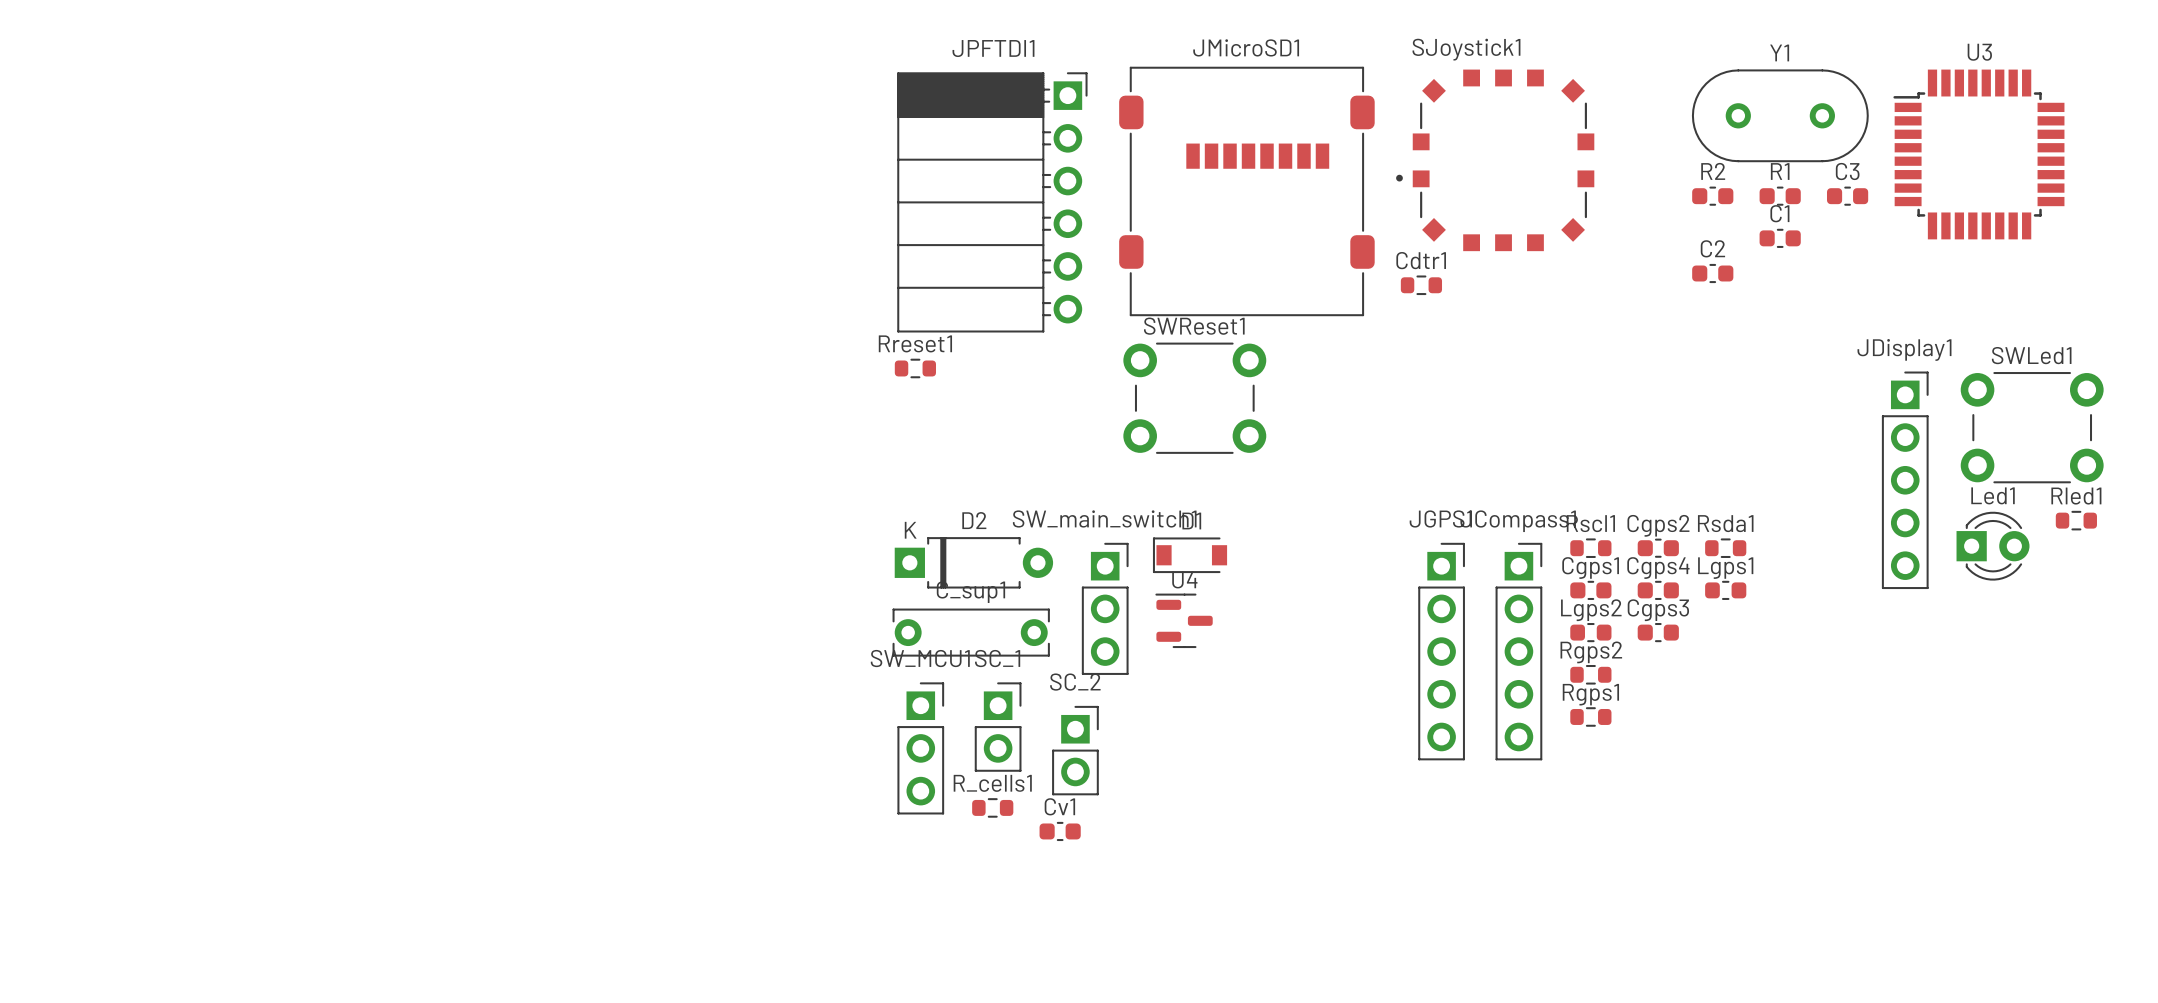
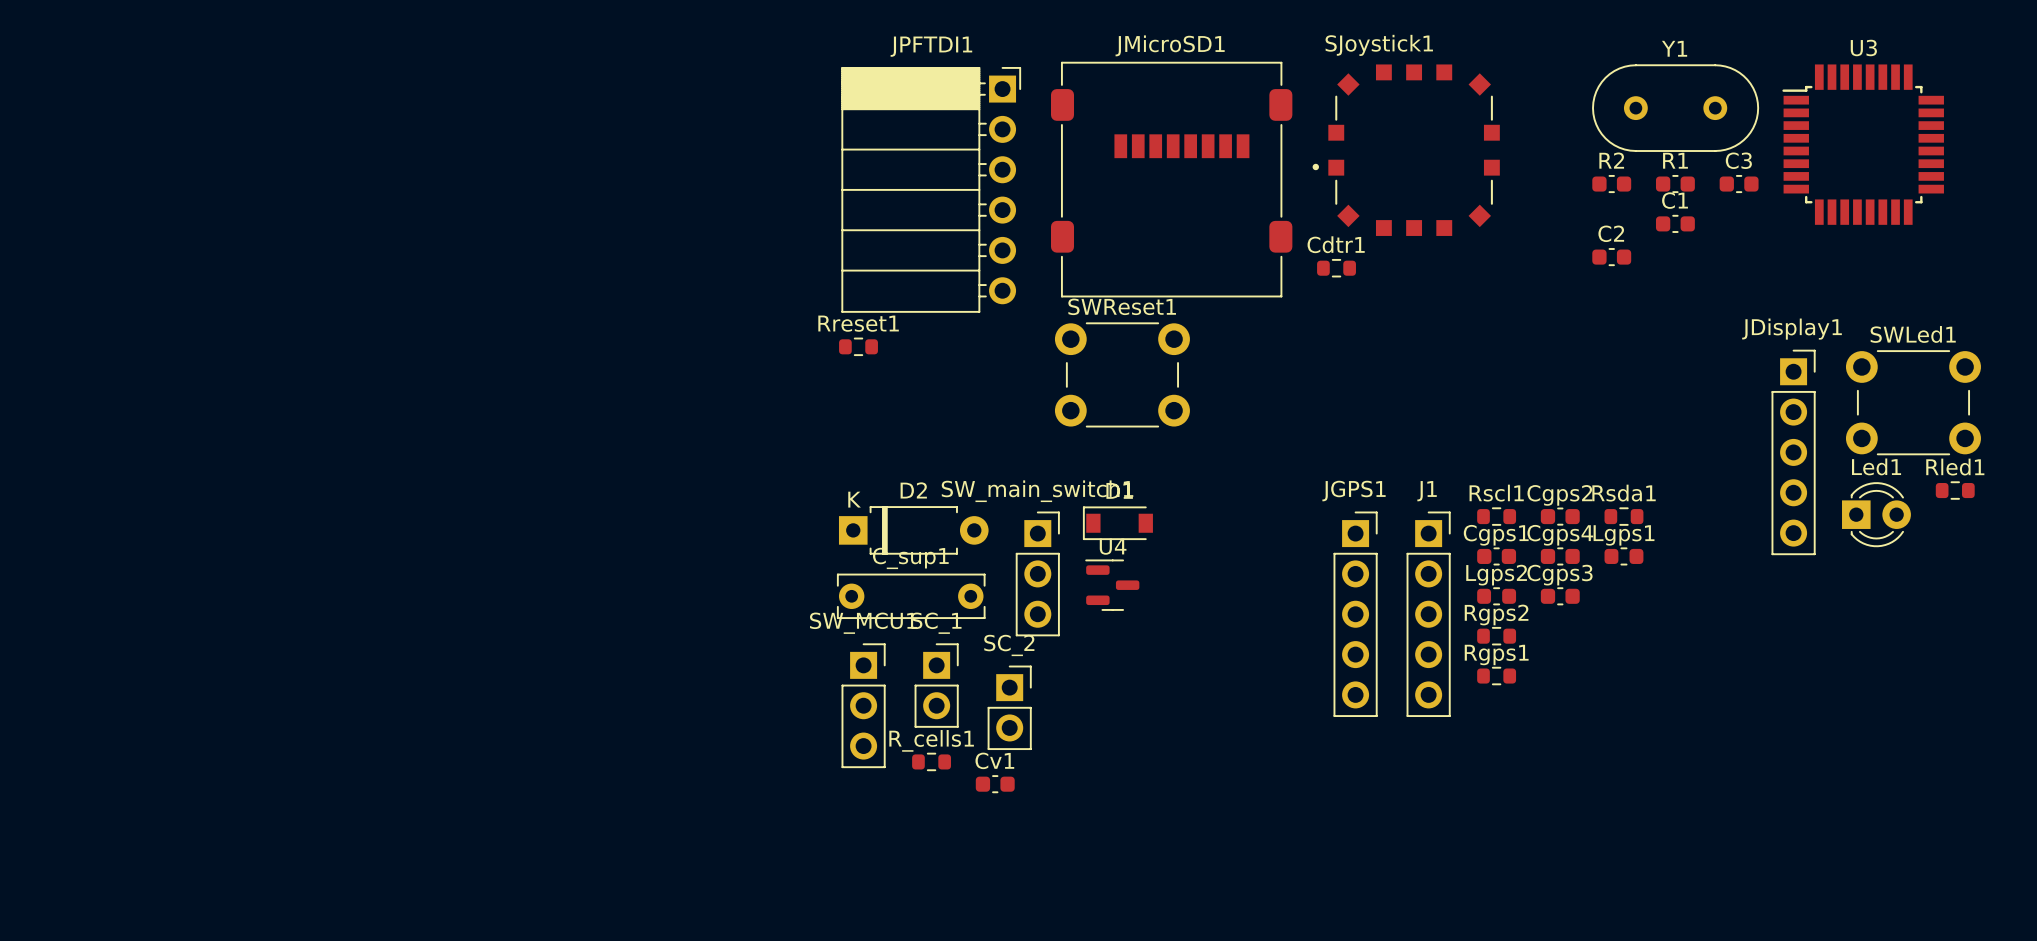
JCompass1 name: JCompass1 (1518, 521) -> J1 (1427, 491)

